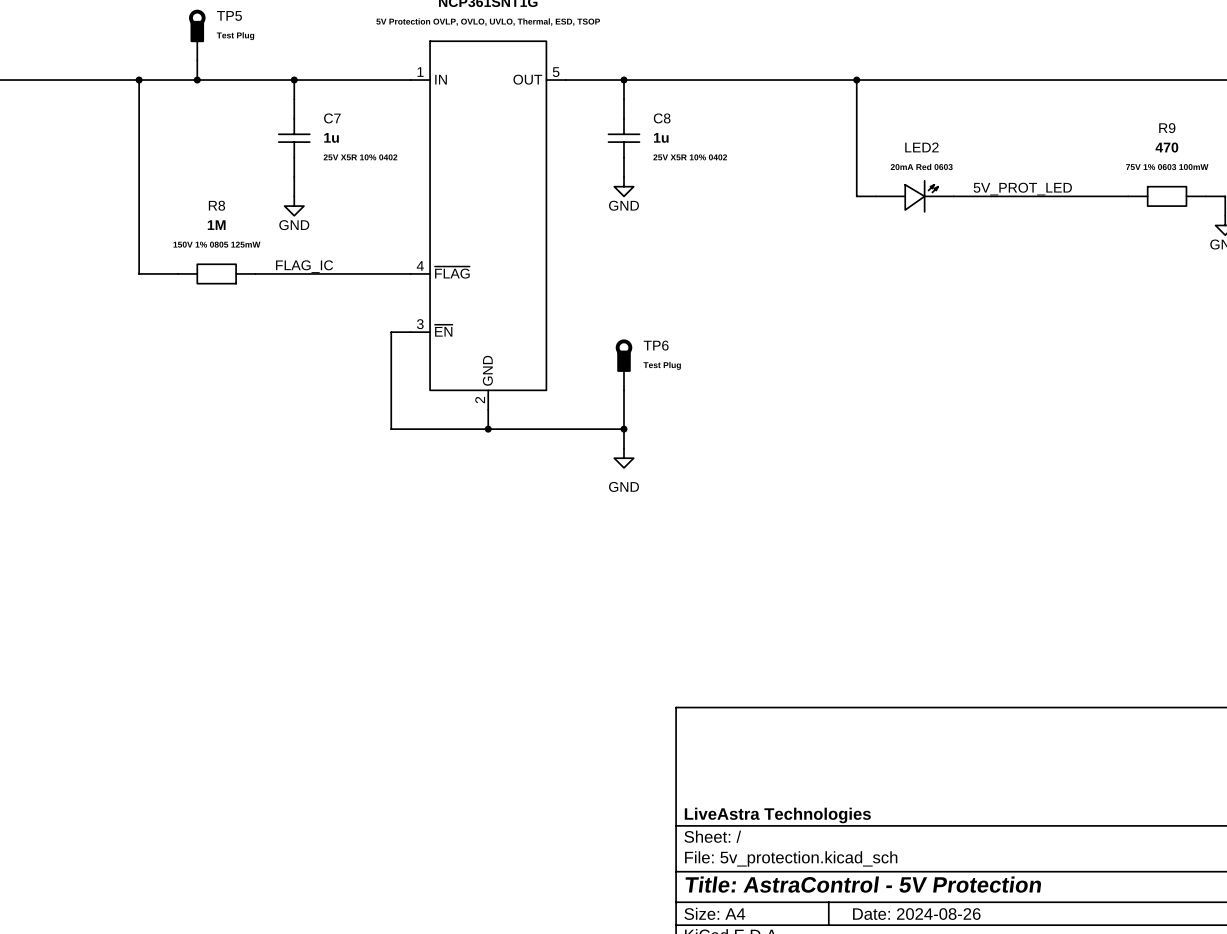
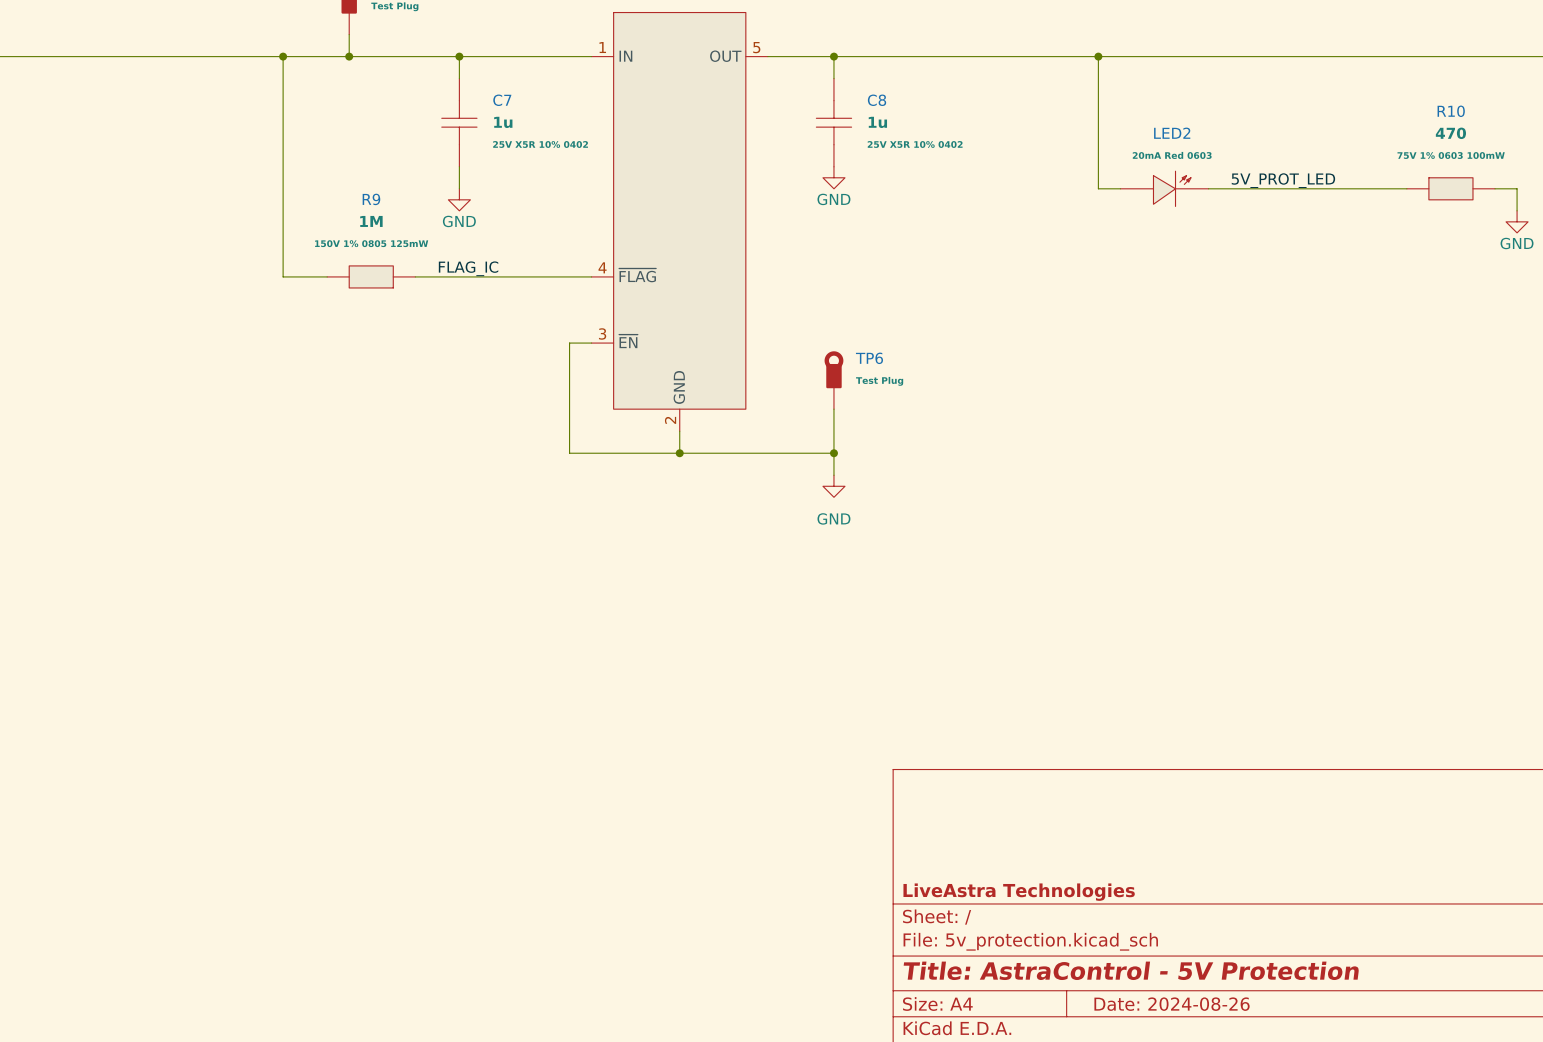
R9 name: R9 (1167, 128) -> R10 (1451, 111)
R8 name: R8 (216, 205) -> R9 (371, 199)

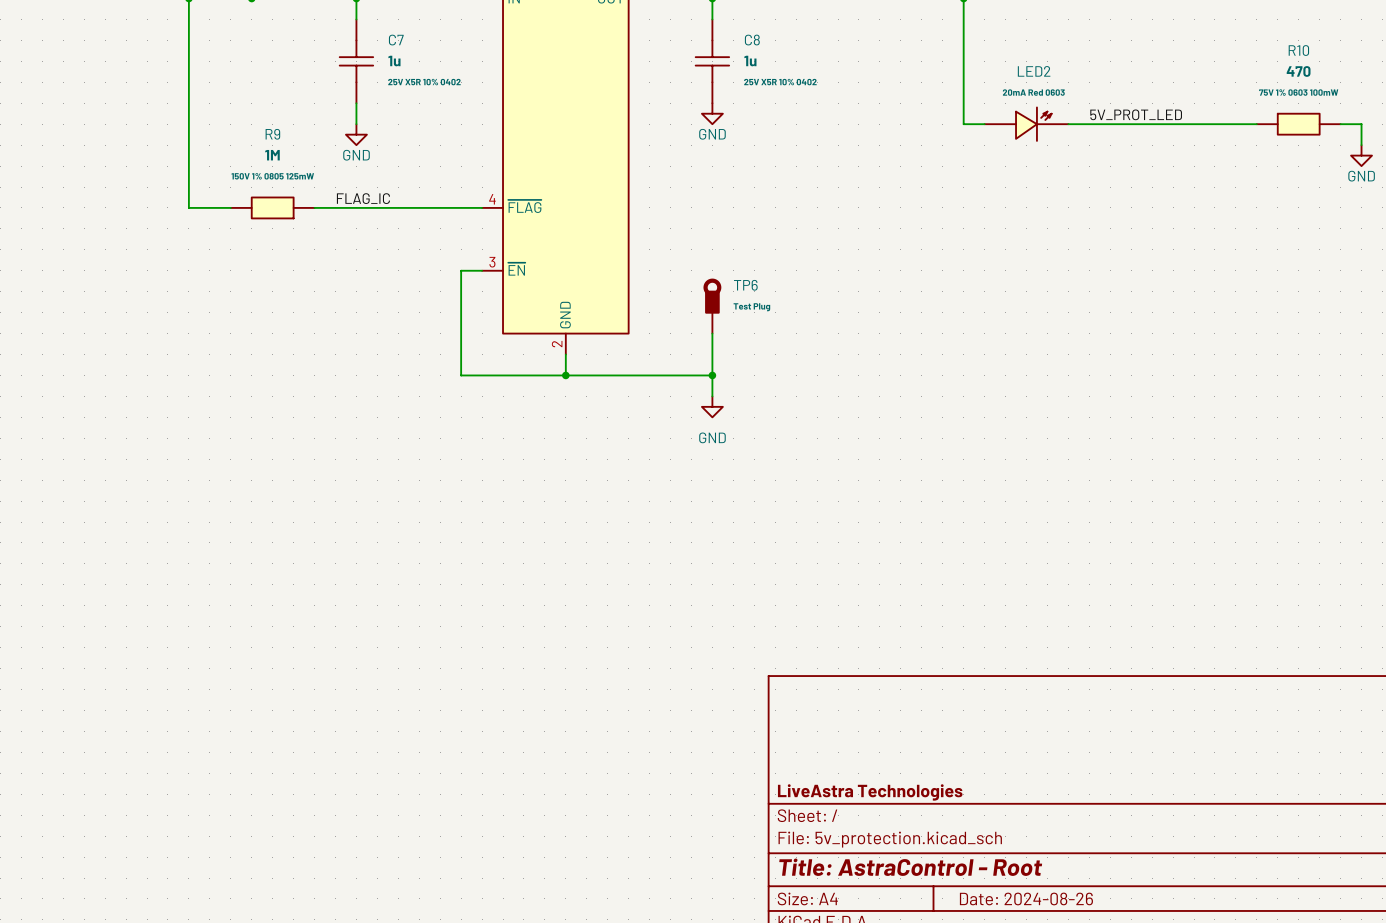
title block: Title: AstraControl - 5V Protection (1131, 970) -> Title: AstraControl - Root (910, 867)

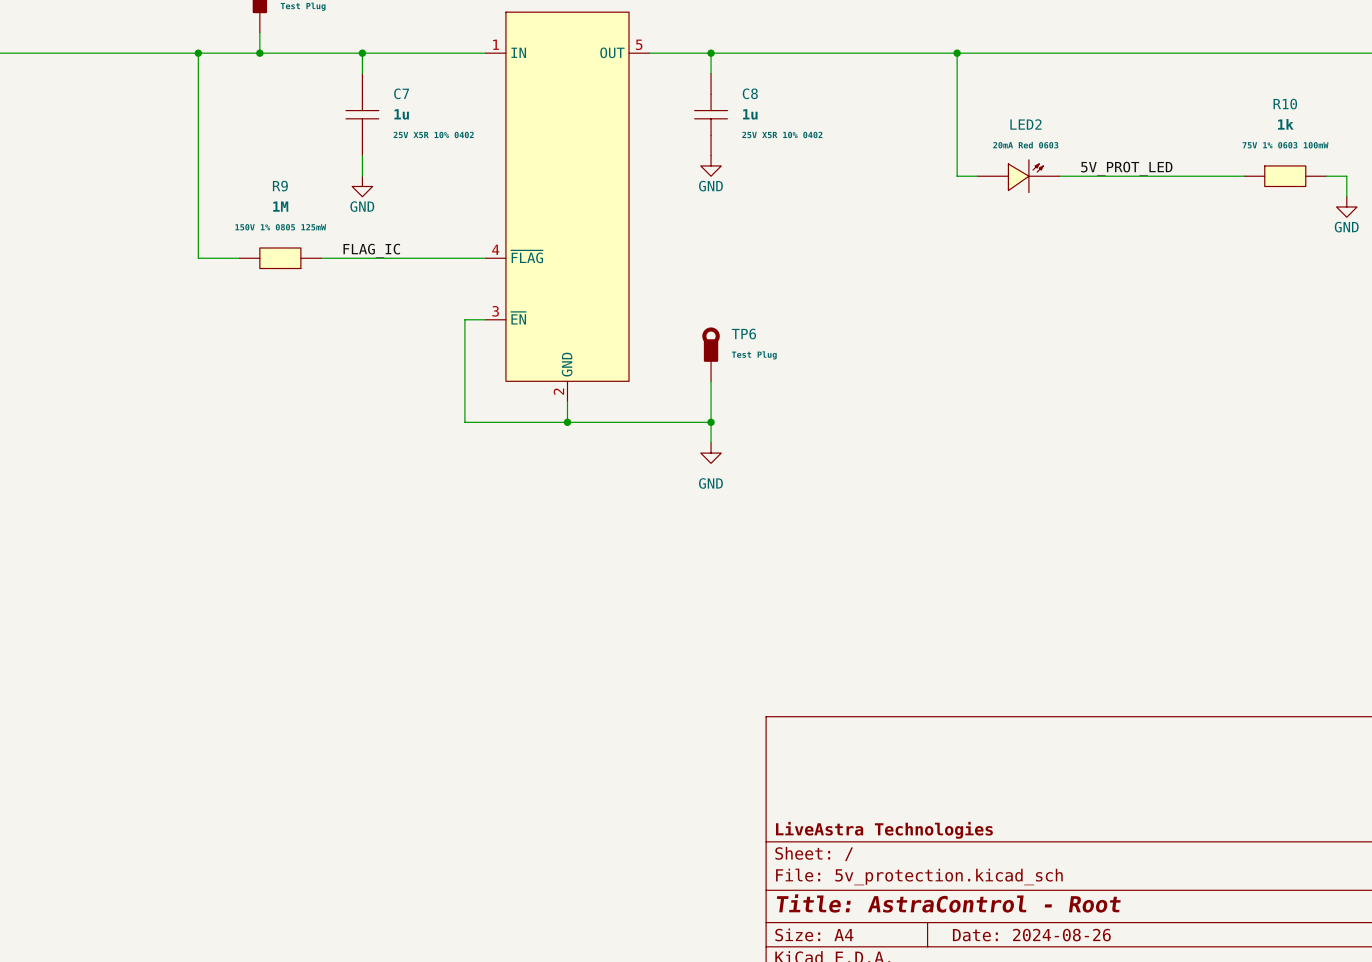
R10 value: 470 (1298, 71) -> 1k (1285, 124)

